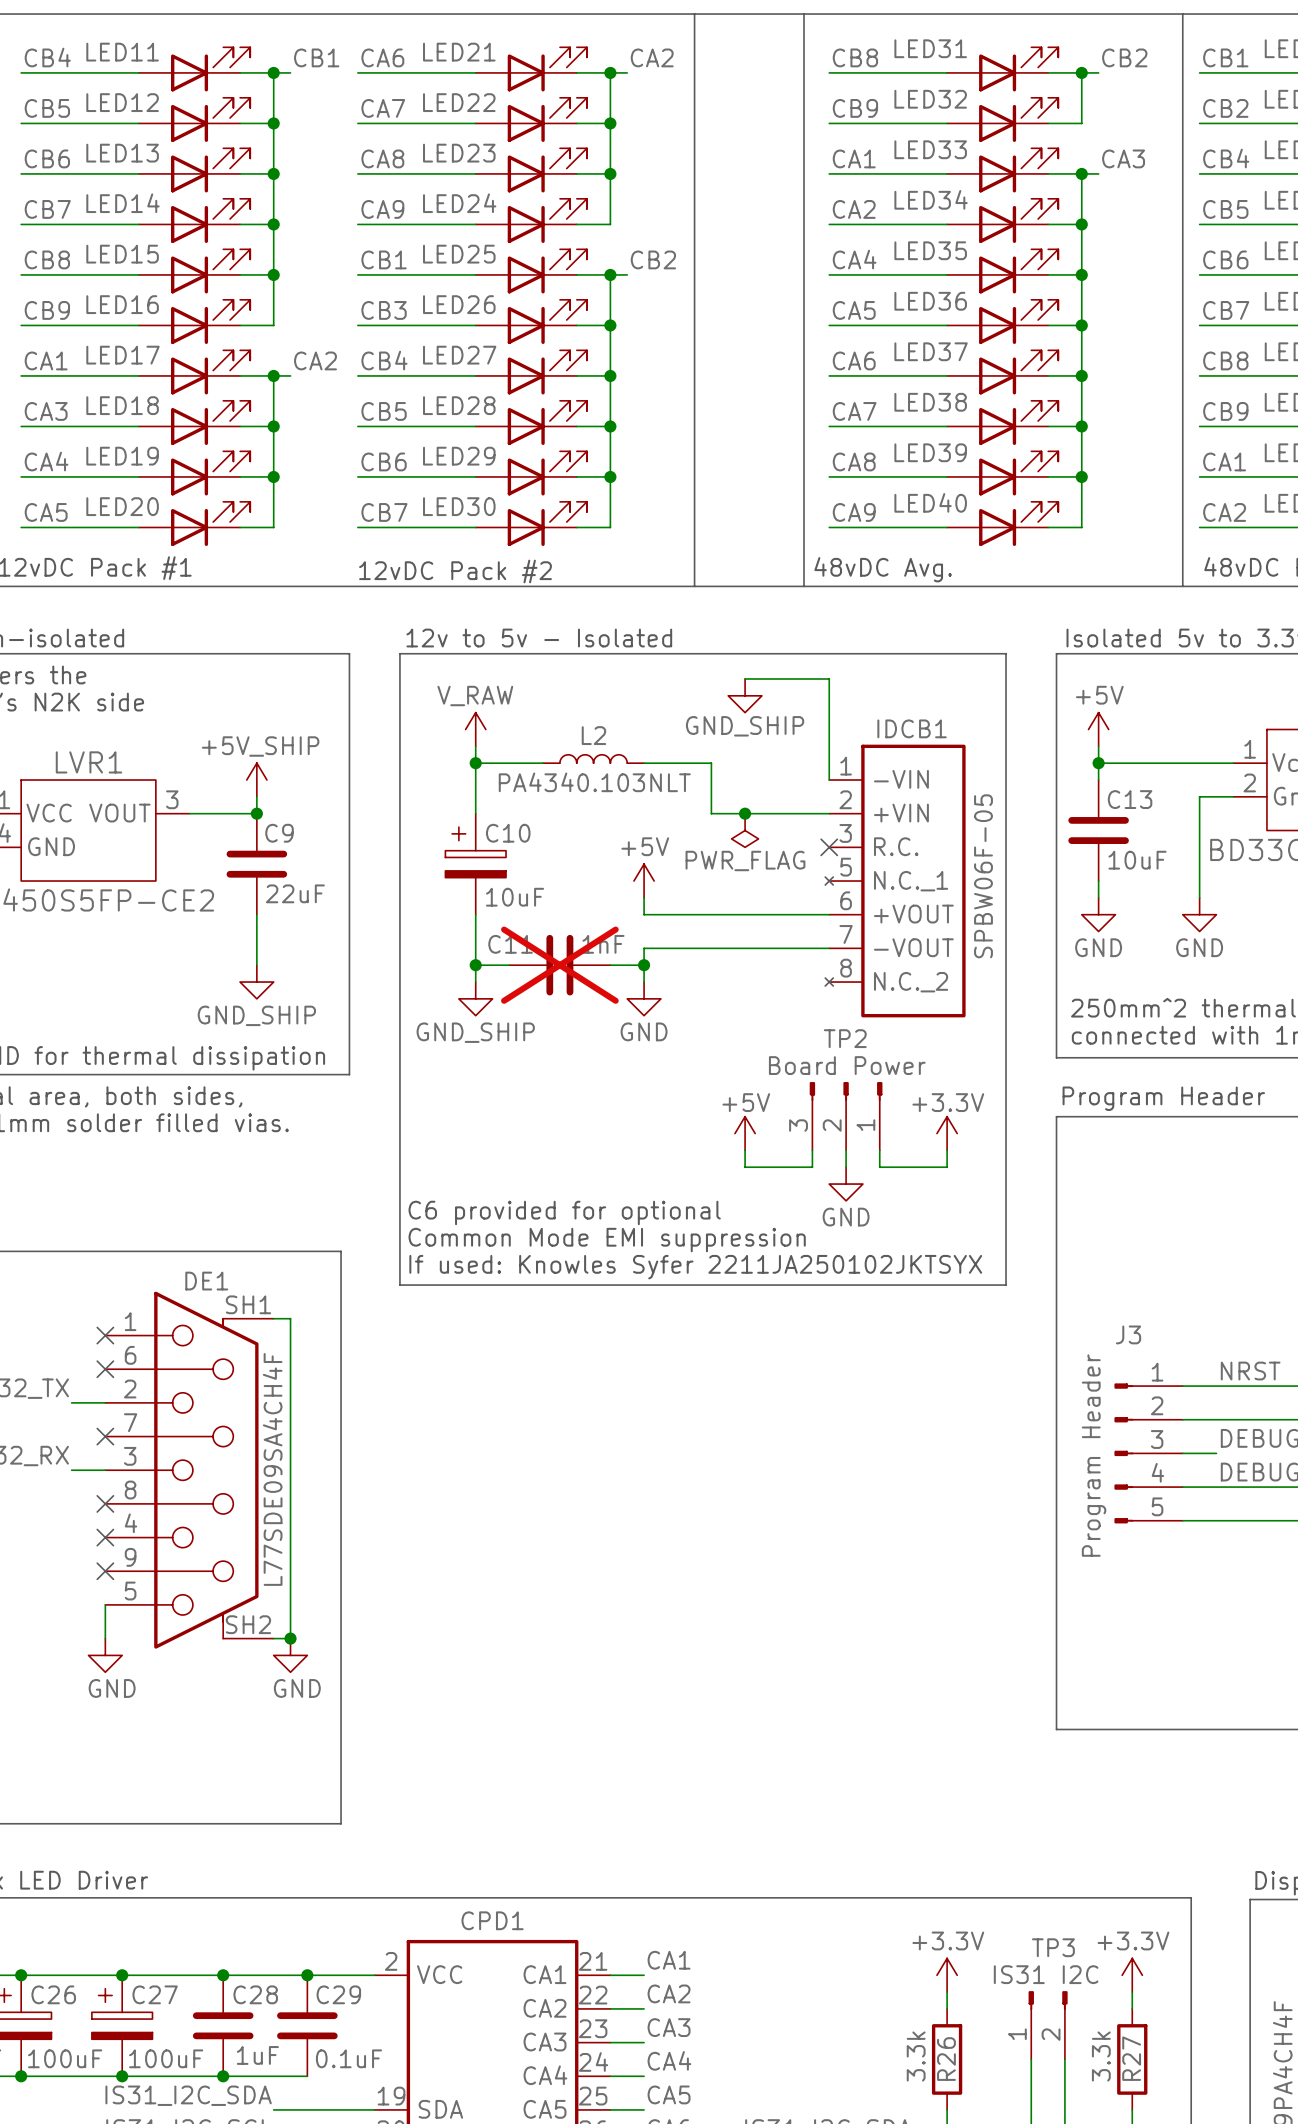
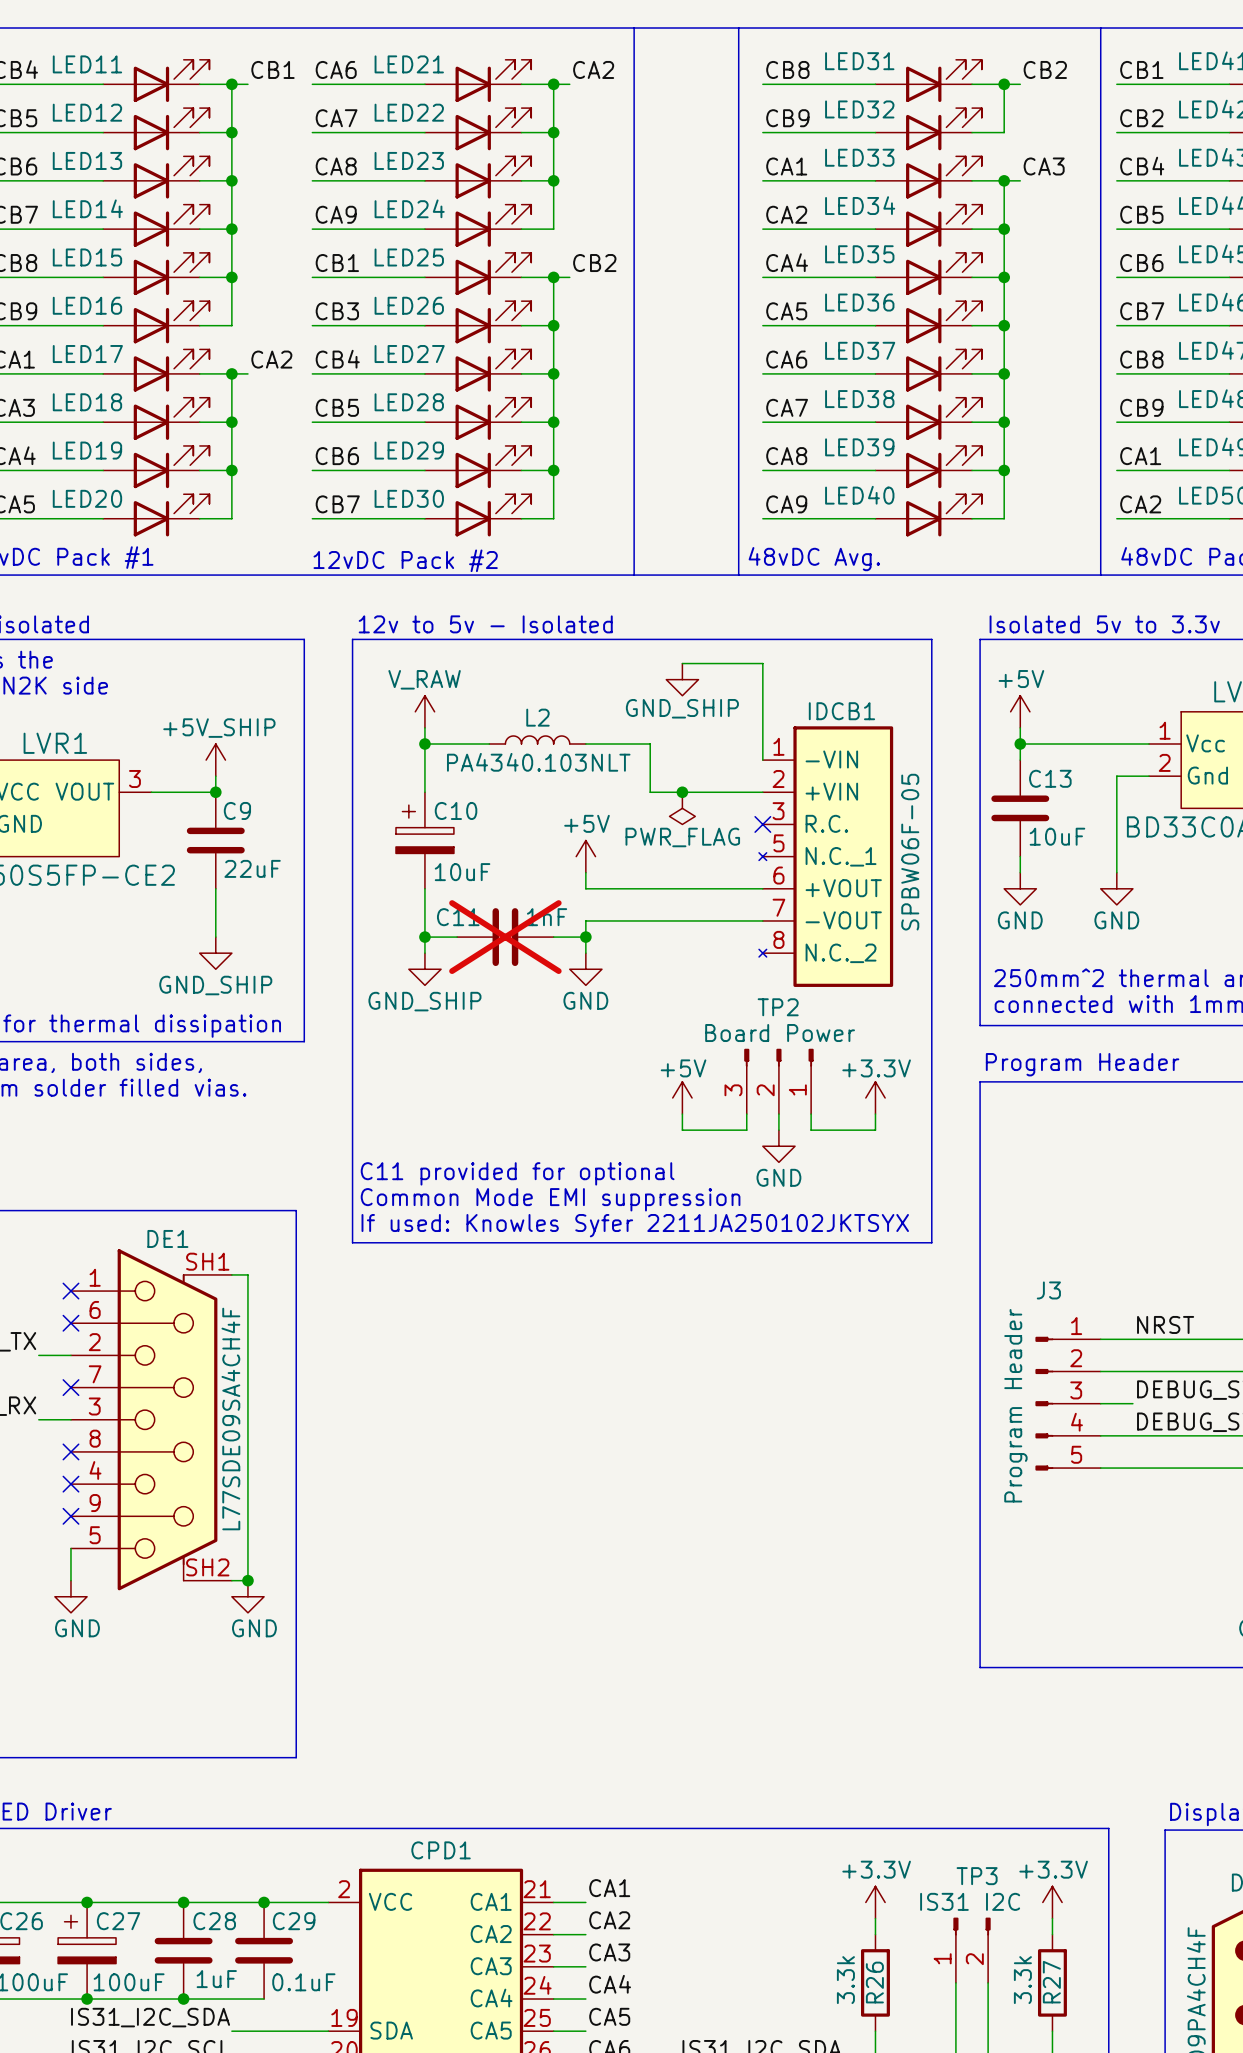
text: C6 provided for optional (564, 1212) -> C11 provided for optional (517, 1173)

